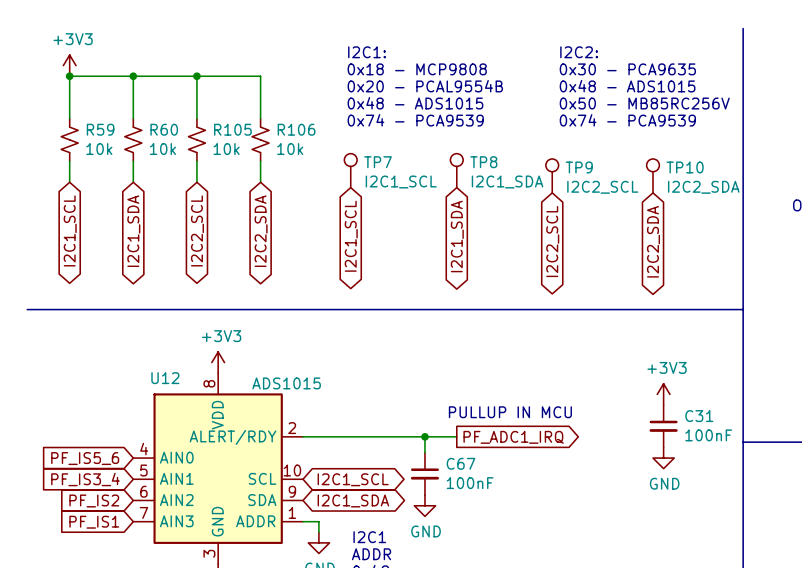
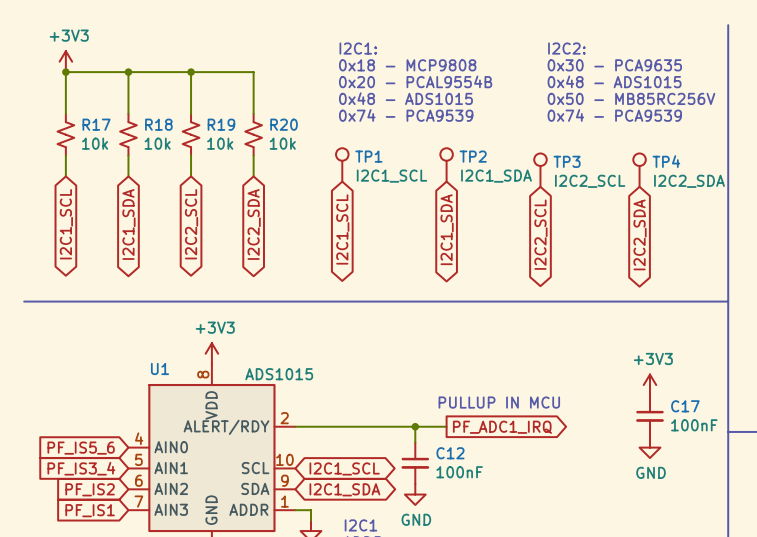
R59 name: R59 (100, 129) -> R17 (96, 124)
R60 name: R60 (164, 129) -> R18 (158, 124)
R105 name: R105 (232, 129) -> R19 (221, 124)
R106 name: R106 (296, 129) -> R20 (284, 124)
TP7 name: TP7 (378, 162) -> TP1 (368, 156)
TP8 name: TP8 (483, 162) -> TP2 (473, 156)
TP9 name: TP9 (579, 167) -> TP3 (567, 161)
TP10 name: TP10 (685, 167) -> TP4 (666, 161)
U12 name: U12 (165, 378) -> U1 (160, 368)
C31 name: C31 (699, 416) -> C17 (685, 406)
C67 name: C67 (460, 463) -> C12 (450, 453)

